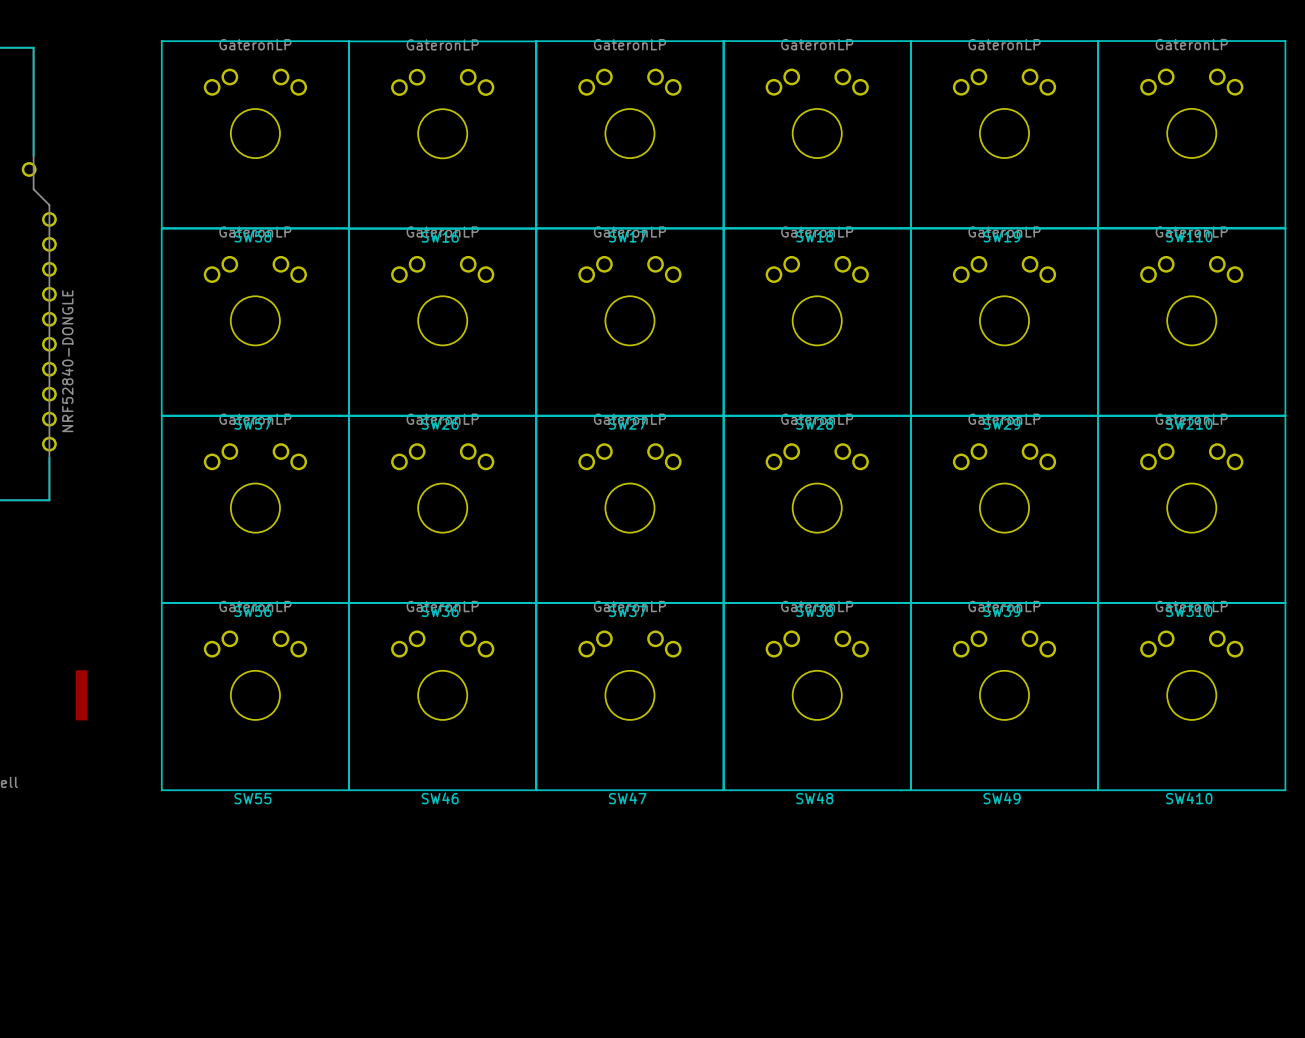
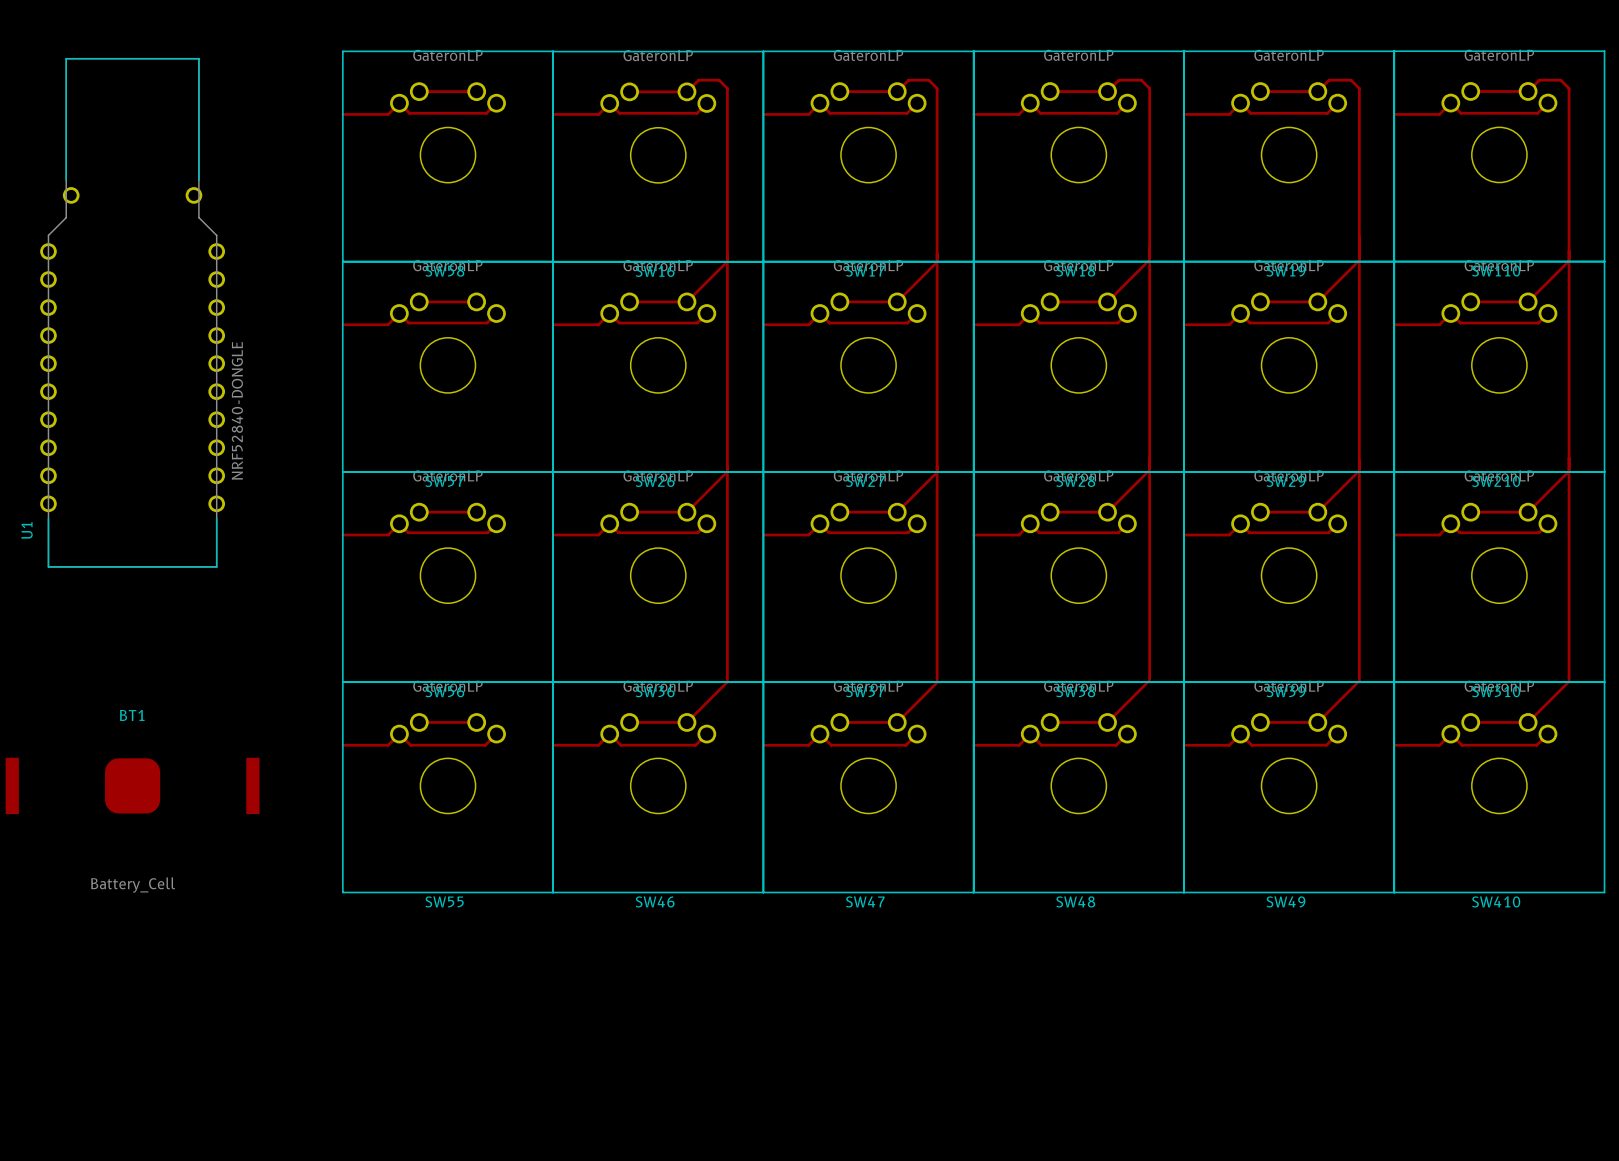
track: none -> (1050, 91) (1107, 91) (1118, 80) (1141, 80) (1149, 88) (1149, 680) (1107, 722) (1050, 722)
track: none -> (1260, 91) (1317, 91) (1329, 80) (1351, 80) (1359, 88) (1359, 680) (1317, 722) (1260, 722)
track: none -> (1470, 91) (1528, 91) (1539, 80) (1560, 80) (1569, 88) (1569, 681) (1528, 722) (1470, 722)
track: none -> (419, 91) (476, 91)
track: none -> (629, 91) (686, 91) (698, 80) (719, 80) (727, 88) (727, 682) (686, 722) (629, 722)
track: none -> (839, 91) (897, 91) (908, 80) (928, 80) (937, 88) (937, 682) (897, 722) (839, 722)
track: none -> (496, 103) (486, 113) (409, 113) (399, 103) (388, 114) (342, 114)
track: none -> (706, 103) (697, 113) (619, 113) (609, 103) (598, 114) (553, 114)
track: none -> (917, 103) (907, 113) (830, 113) (819, 103) (808, 114) (763, 114)
track: none -> (1127, 103) (1117, 113) (1040, 113) (1030, 103) (1018, 114) (973, 114)
track: none -> (1337, 103) (1327, 113) (1250, 113) (1240, 103) (1229, 114) (1183, 114)
track: none -> (1547, 103) (1537, 113) (1461, 113) (1450, 103) (1439, 114) (1394, 114)
track: none -> (1149, 259) (1107, 301) (1050, 301)
track: none -> (1359, 260) (1317, 301) (1260, 301)
track: none -> (1569, 260) (1528, 301) (1470, 301)
track: none -> (727, 261) (686, 301) (629, 301)
track: none -> (937, 262) (897, 301) (839, 301)
track: none -> (419, 301) (476, 301)
track: none -> (496, 313) (486, 323) (408, 323) (399, 313) (388, 324) (342, 324)
track: none -> (706, 313) (697, 323) (619, 323) (609, 313) (598, 324) (553, 324)
track: none -> (917, 313) (907, 323) (829, 323) (819, 313) (808, 324) (763, 324)
track: none -> (1127, 313) (1117, 323) (1039, 323) (1030, 313) (1019, 324) (973, 324)
track: none -> (1337, 313) (1328, 323) (1250, 323) (1240, 313) (1229, 324) (1183, 324)
track: none -> (1547, 313) (1538, 323) (1460, 323) (1450, 313) (1439, 324) (1394, 324)
track: none -> (1149, 470) (1107, 512) (1050, 512)
track: none -> (1359, 470) (1317, 512) (1260, 512)
track: none -> (727, 471) (686, 512) (629, 512)
track: none -> (1569, 471) (1528, 512) (1470, 512)
track: none -> (937, 472) (897, 512) (839, 512)
track: none -> (419, 512) (476, 512)
track: none -> (496, 523) (487, 532) (408, 532) (399, 523) (388, 535) (342, 535)
track: none -> (706, 523) (697, 532) (618, 532) (609, 523) (598, 535) (553, 535)
track: none -> (917, 523) (908, 532) (828, 532) (819, 523) (808, 535) (763, 535)
track: none -> (1127, 523) (1118, 532) (1039, 532) (1030, 523) (1019, 535) (973, 535)
track: none -> (1337, 523) (1328, 532) (1249, 532) (1240, 523) (1229, 535) (1183, 535)
track: none -> (1547, 523) (1538, 532) (1459, 532) (1450, 523) (1439, 535) (1394, 535)
track: none -> (419, 722) (476, 722)
track: none -> (496, 734) (485, 745) (410, 745) (399, 734) (388, 745) (342, 745)
track: none -> (706, 734) (695, 745) (620, 745) (609, 734) (598, 745) (553, 745)
track: none -> (917, 734) (905, 745) (831, 745) (819, 734) (808, 745) (763, 745)
track: none -> (1127, 734) (1116, 745) (1041, 745) (1030, 734) (1019, 745) (973, 745)
track: none -> (1337, 734) (1326, 745) (1251, 745) (1240, 734) (1229, 745) (1183, 745)
track: none -> (1547, 734) (1536, 745) (1462, 745) (1450, 734) (1439, 745) (1394, 745)

